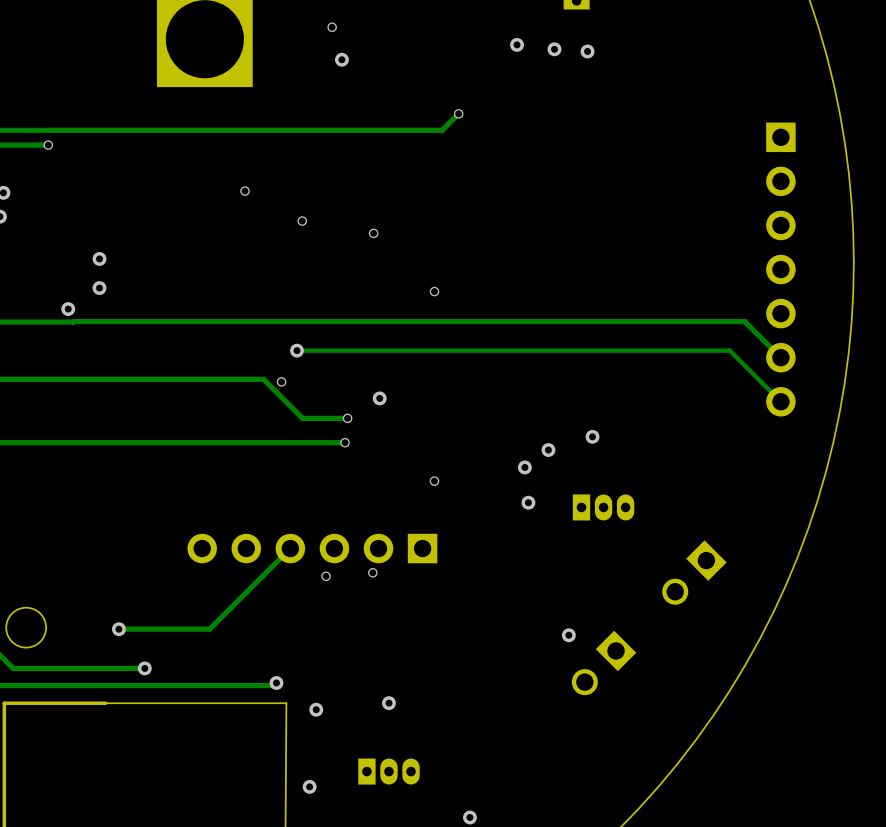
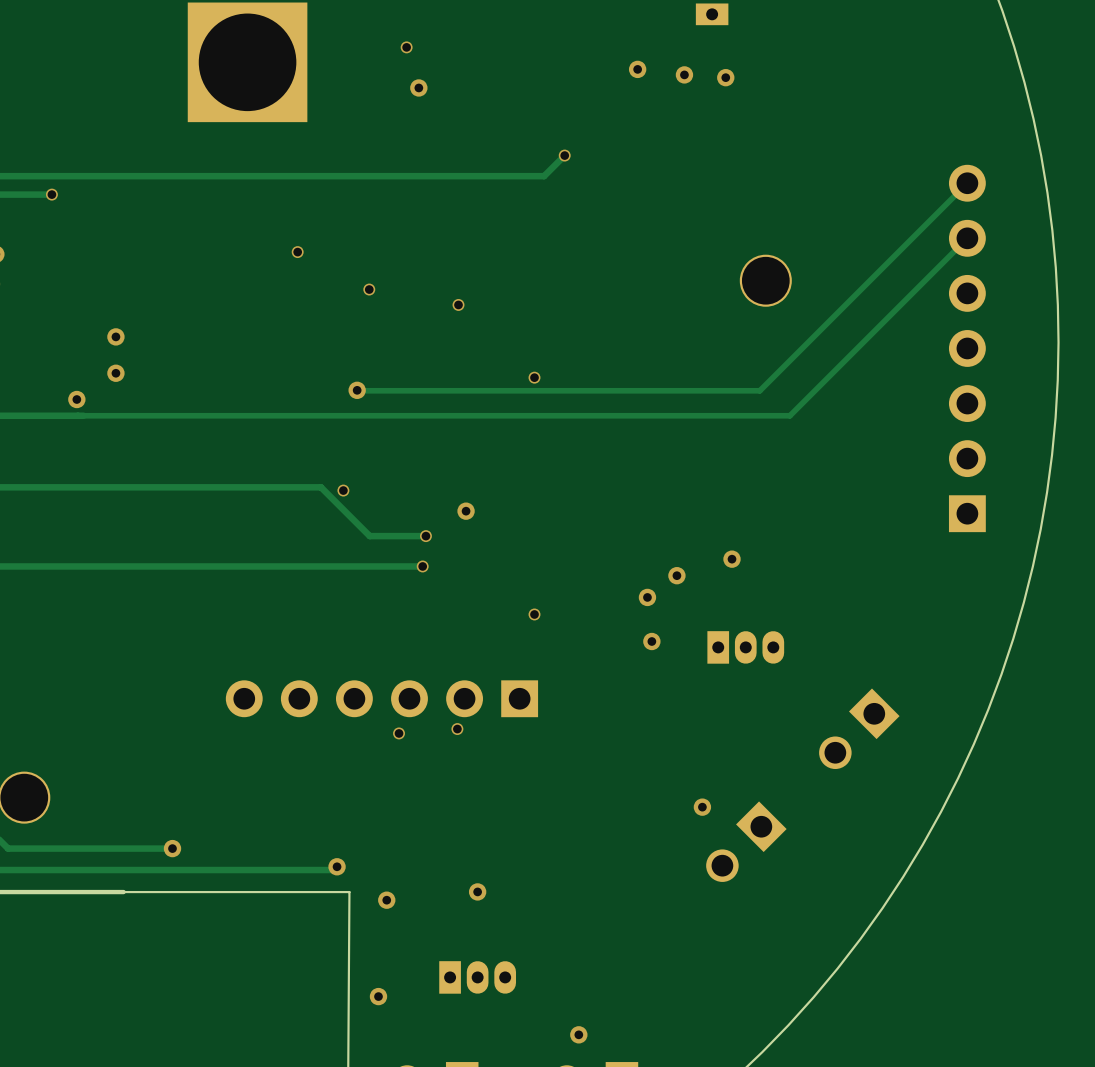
track: none -> (967, 183) (759, 390) (357, 390)
part: none -> (765, 280)
part rotation: 0° (780, 269) -> 180° (967, 348)
track: (73, 322) (744, 321) (780, 357) -> (83, 415) (789, 415) (967, 238)
track: (296, 350) (729, 350) (780, 401) -> none
via position: (296, 350) -> (357, 390)
track: (290, 548) (209, 629) (118, 629) -> none
via: (118, 629) -> none

